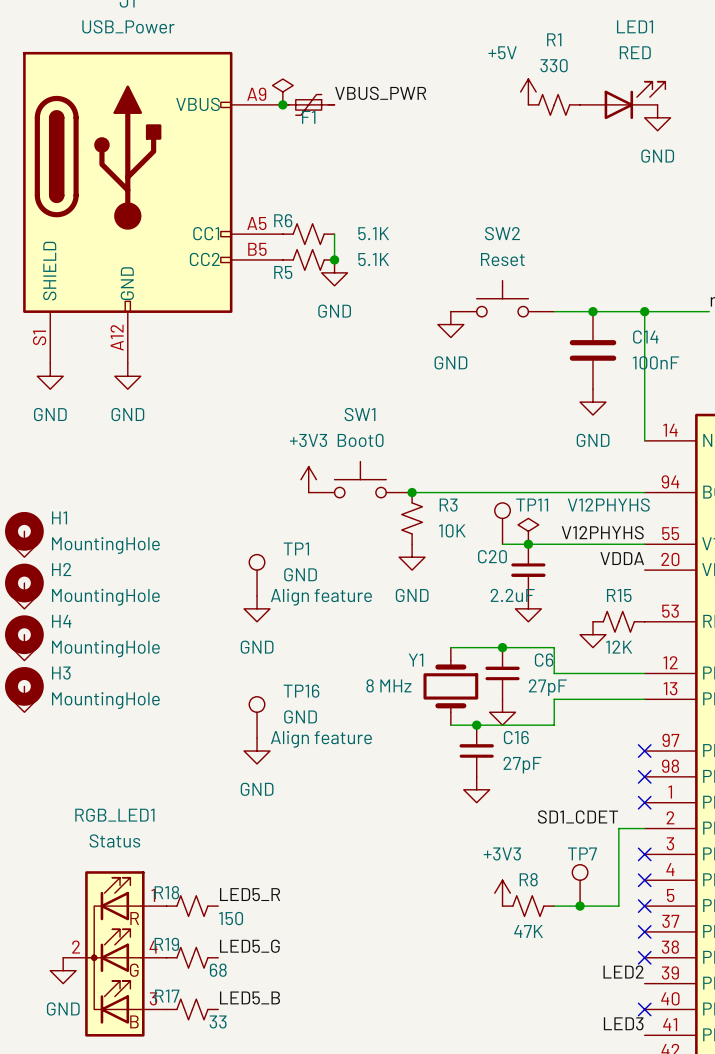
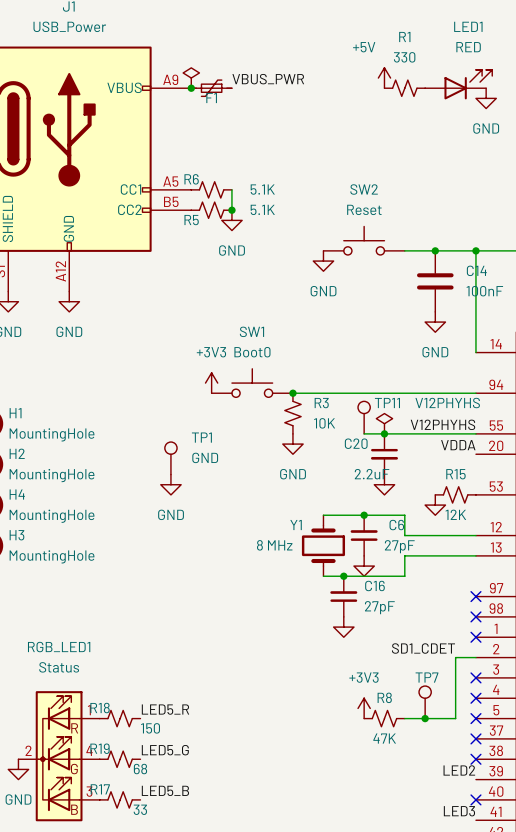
TP1 text: Align feature (321, 597) -> none
TP16: GND (257, 717) -> none
power symbol: GND (257, 751) -> none

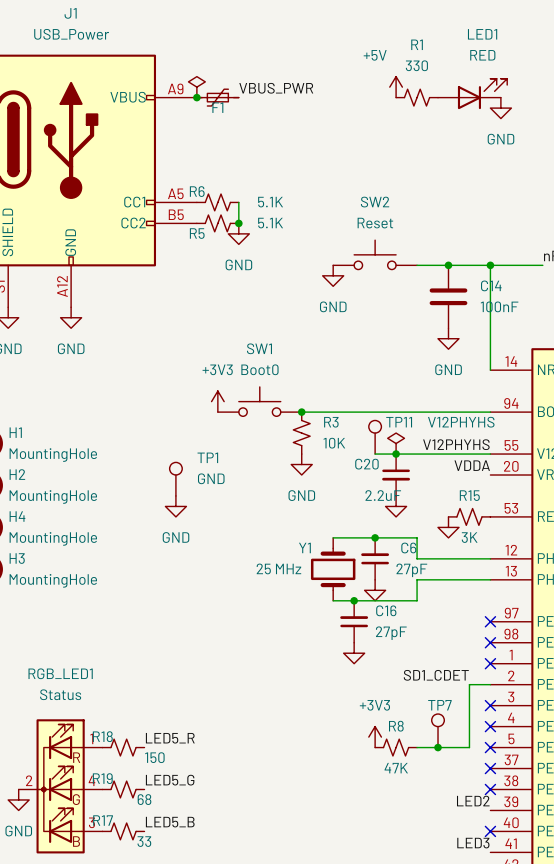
R15 value: 12K (455, 514) -> 3K (469, 537)
Y1 value: 8 MHz (274, 545) -> 25 MHz (278, 568)

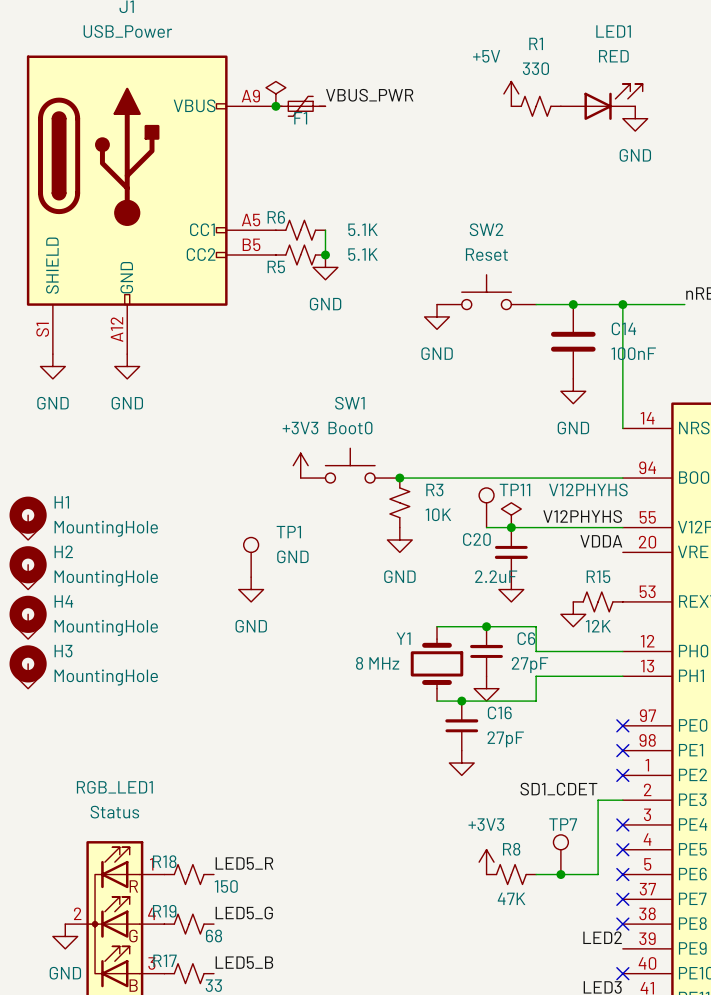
R15 value: 3K (469, 537) -> 12K (598, 626)
Y1 value: 25 MHz (278, 568) -> 8 MHz (377, 663)

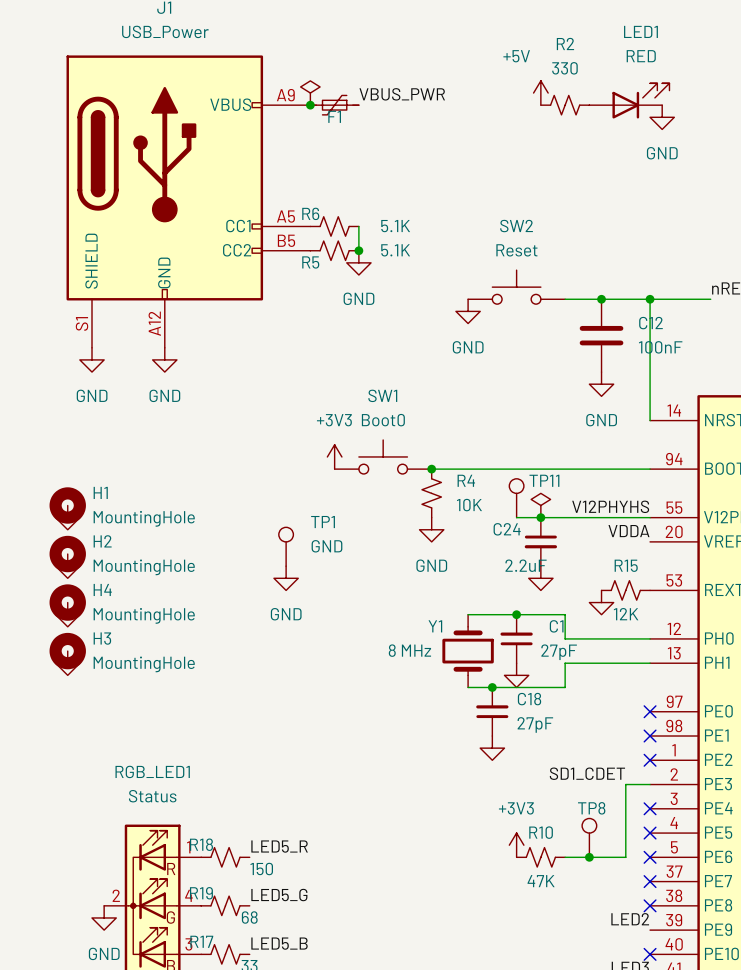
R1 name: R1 (536, 43) -> R2 (565, 43)
C14 name: C14 (623, 328) -> C12 (650, 323)
TP11 value: V12PHYHS (588, 489) -> none
R3 name: R3 (434, 490) -> R4 (466, 480)
C20 name: C20 (476, 539) -> C24 (507, 529)
C6 name: C6 (526, 638) -> C1 (556, 626)
C16 name: C16 (499, 712) -> C18 (529, 699)
TP7 name: TP7 (563, 824) -> TP8 (591, 808)
R8 name: R8 (511, 849) -> R10 (541, 832)

